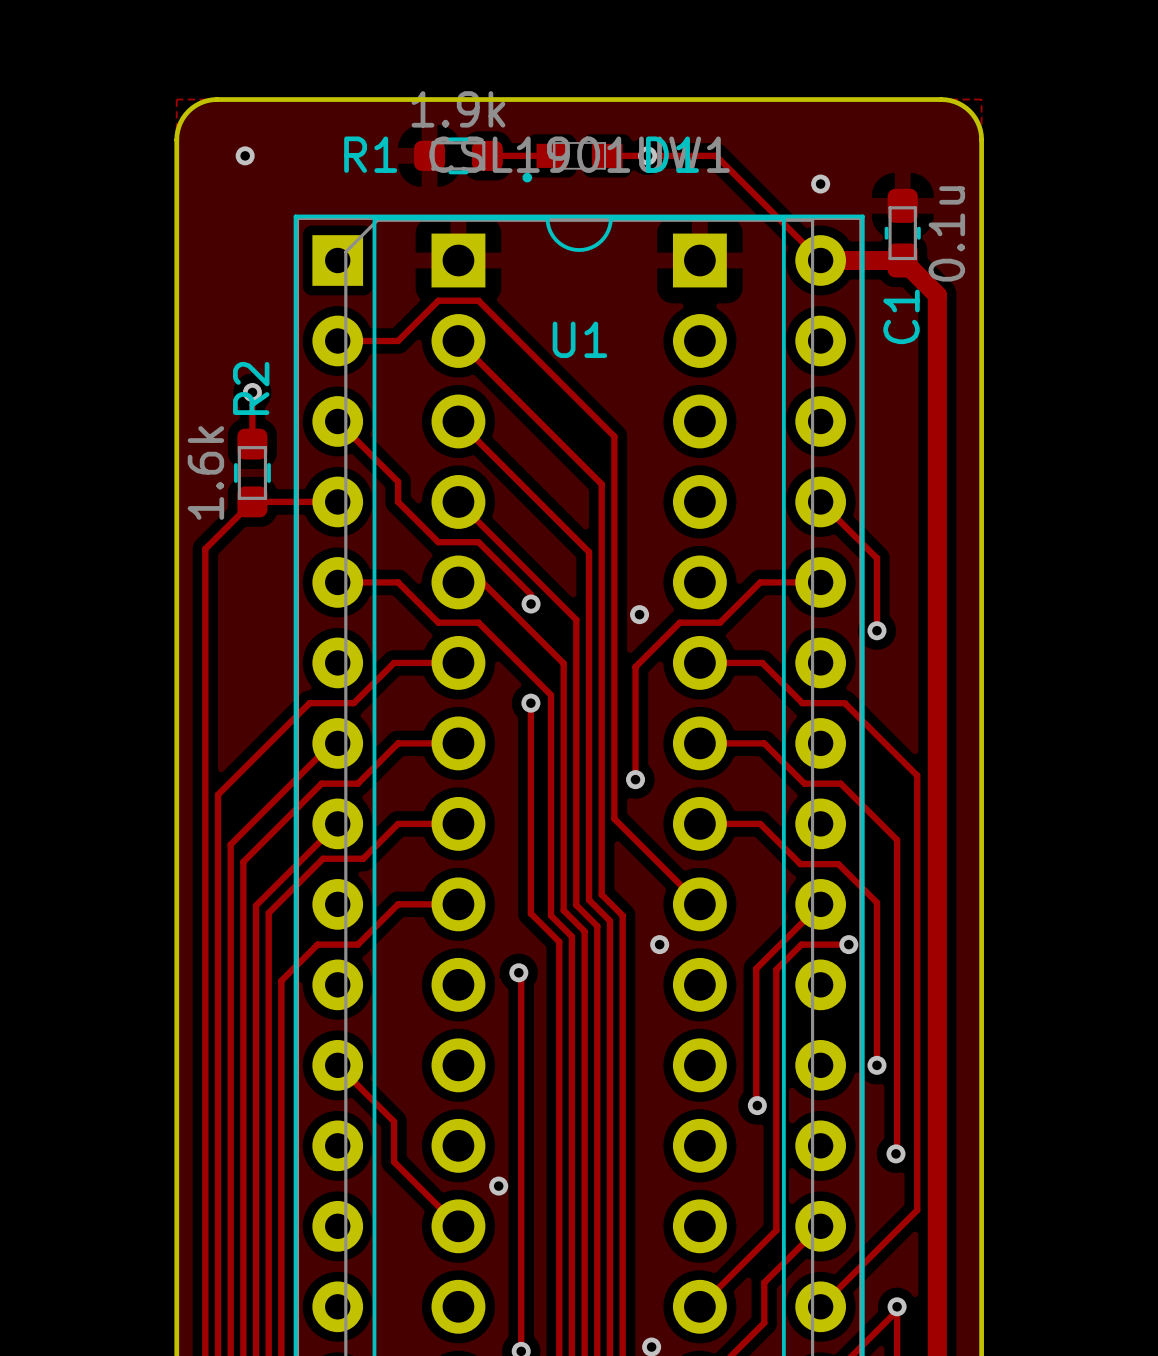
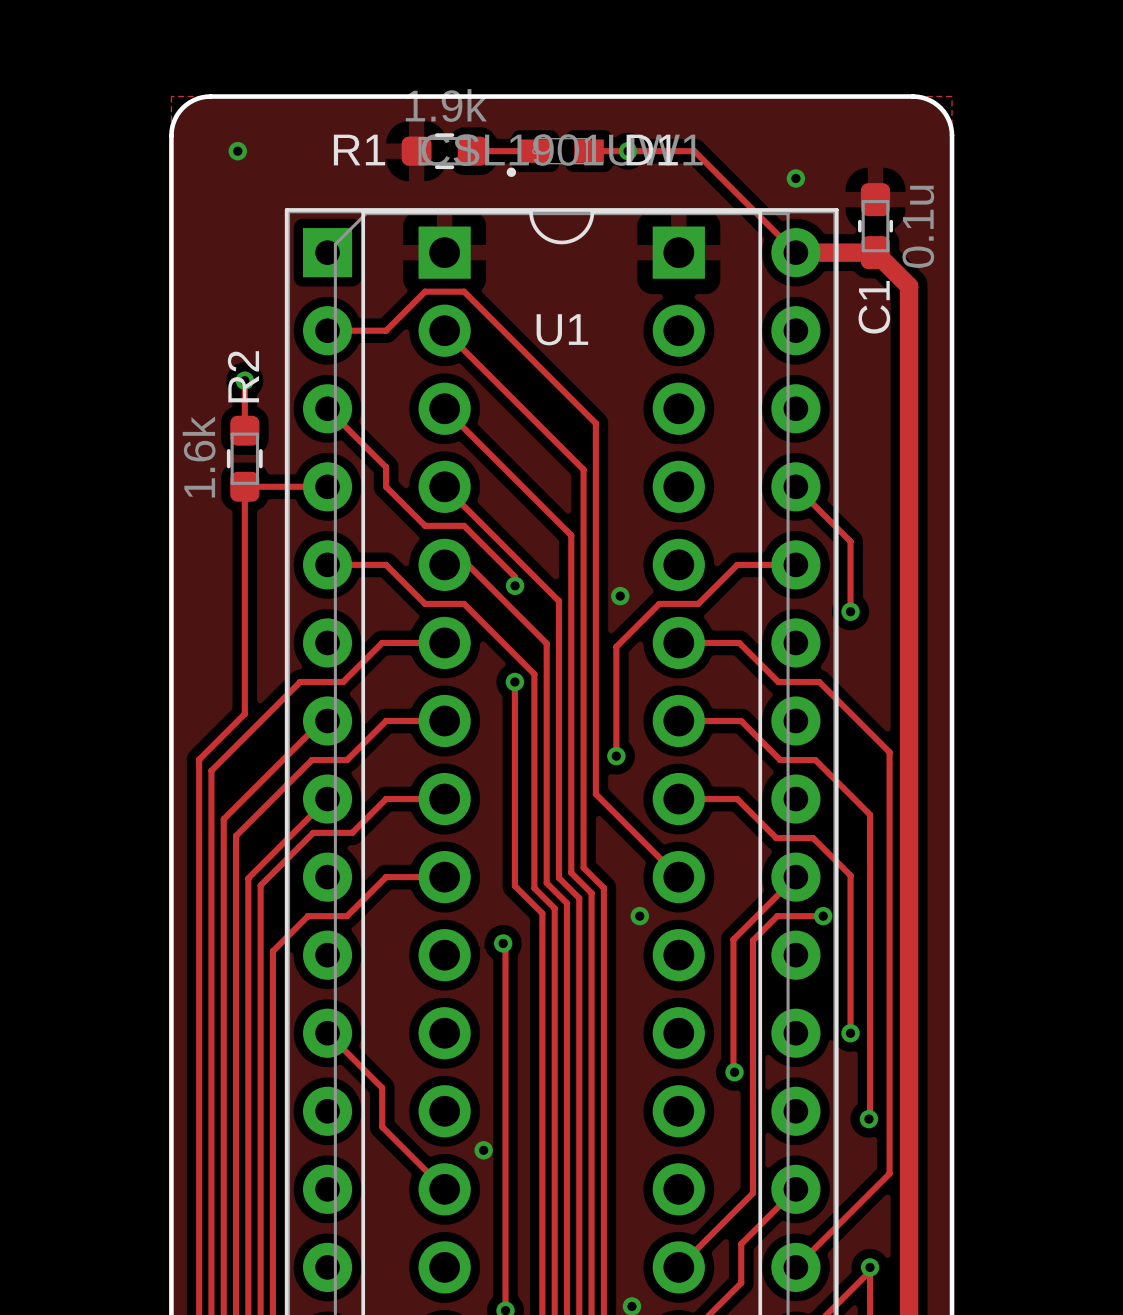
track: (252, 501) (205, 548) (205, 783) -> (244, 486) (244, 713) (199, 759)

